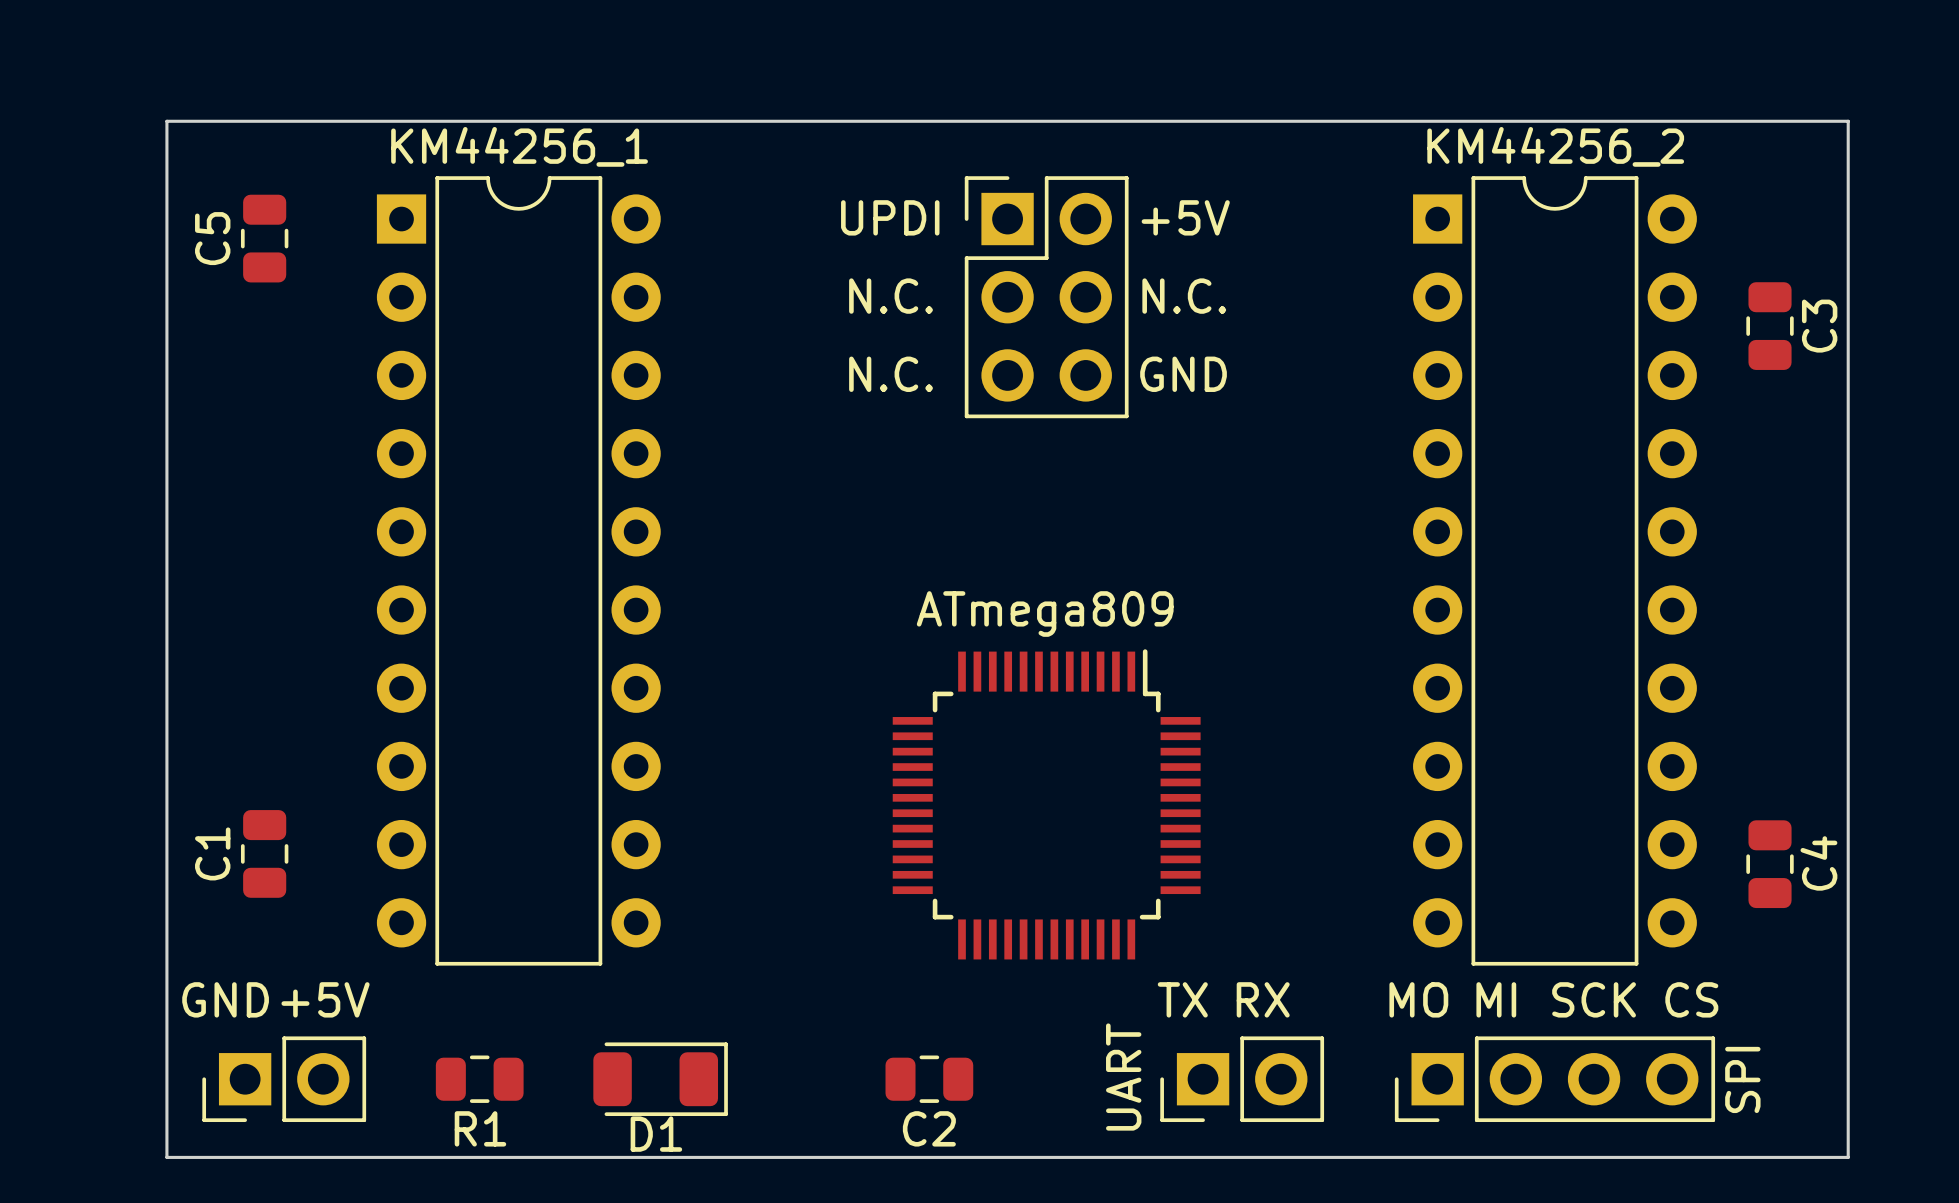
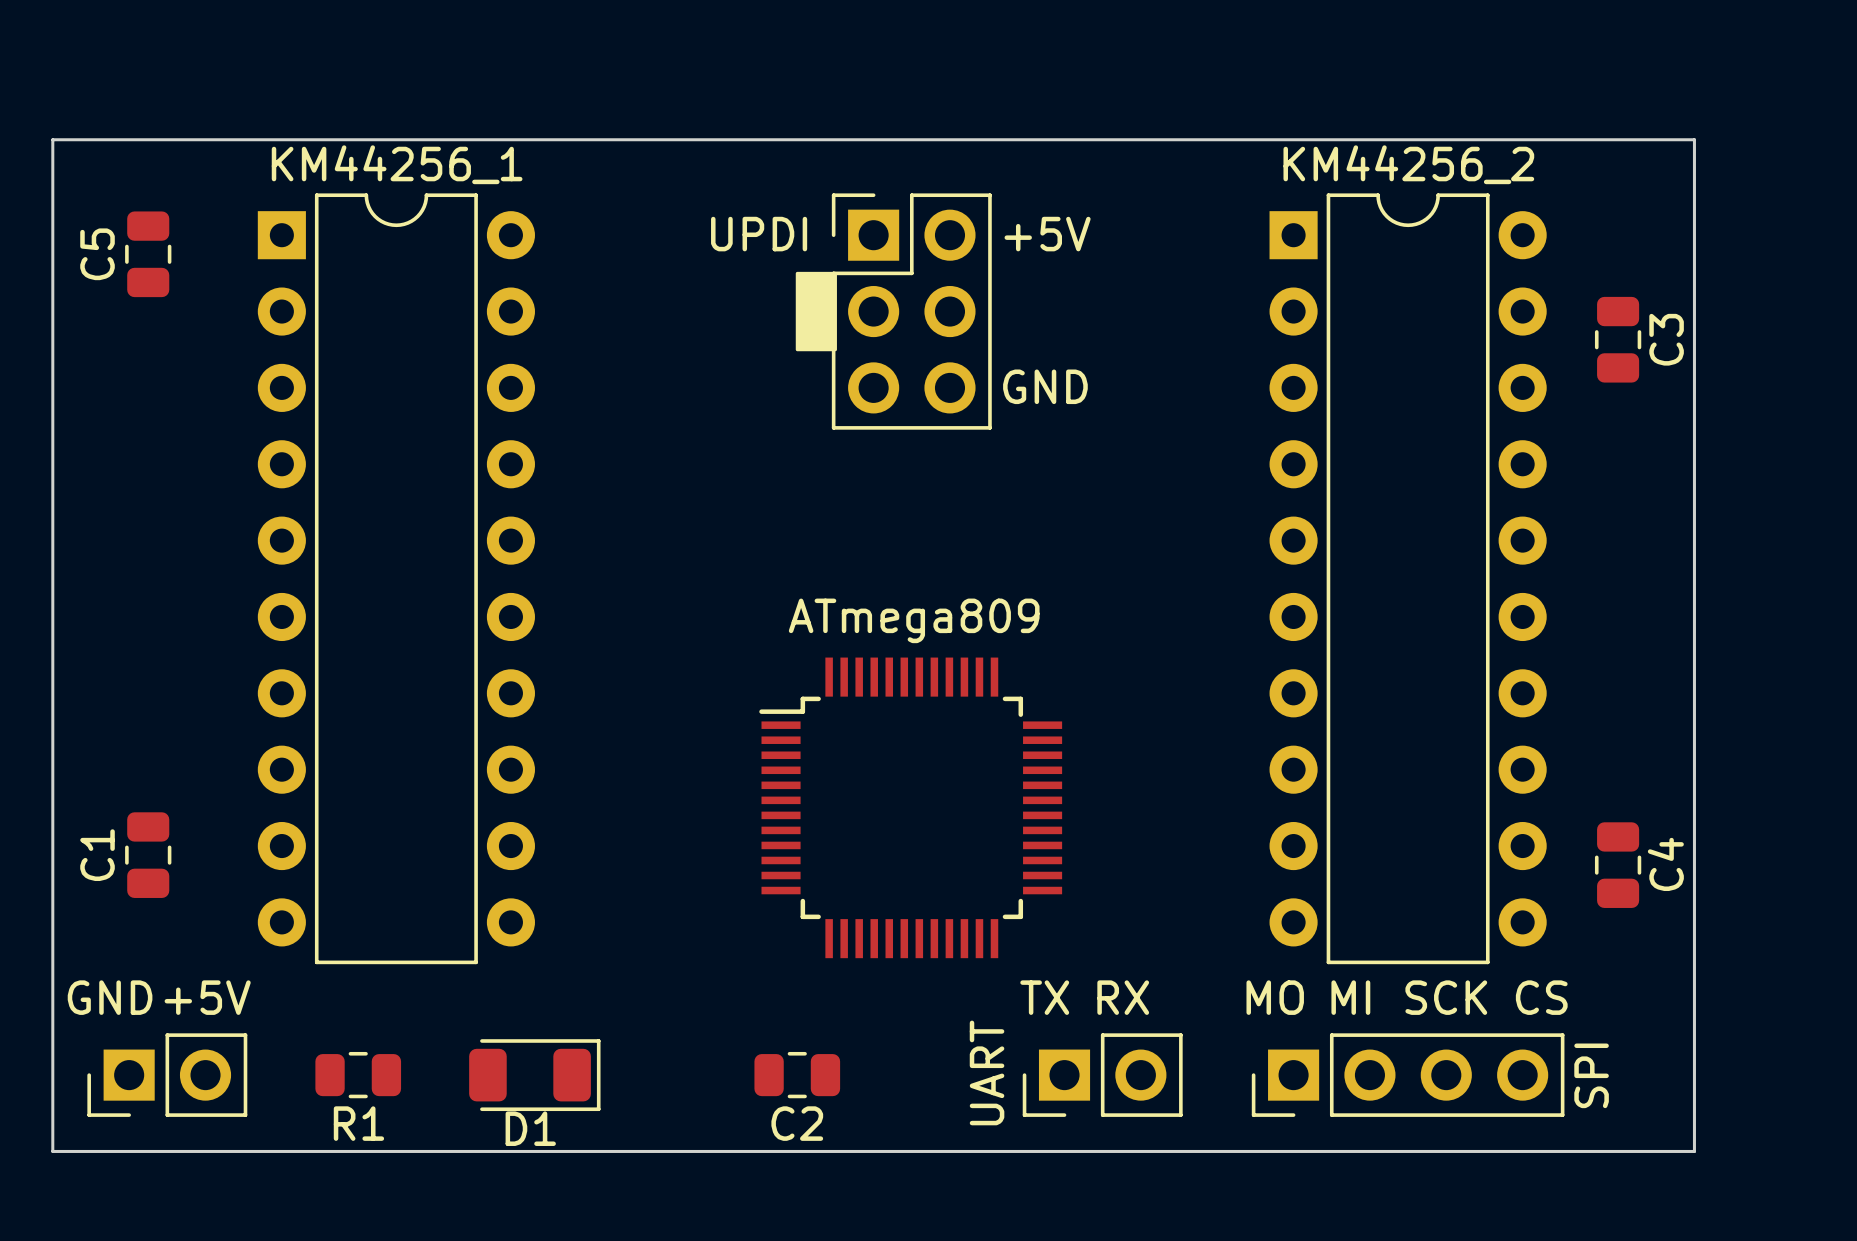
drawing: none -> [795, 271, 837, 352]
text: N.C. (891, 296) -> none
text: N.C. (1184, 296) -> none
text: N.C. (891, 374) -> none
ATmega809 rotation: 0° (1046, 804) -> 90° counterclockwise (910, 807)

